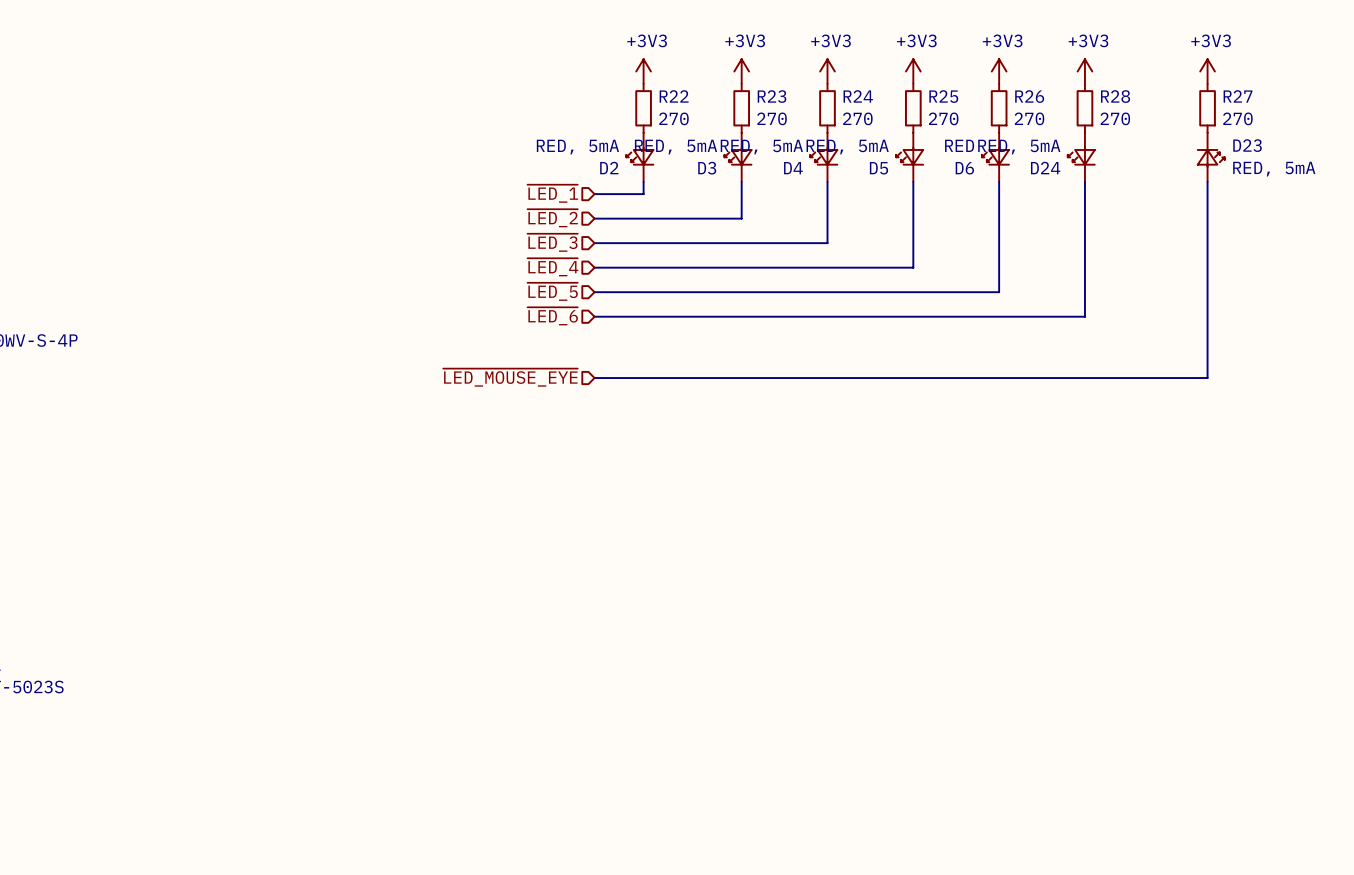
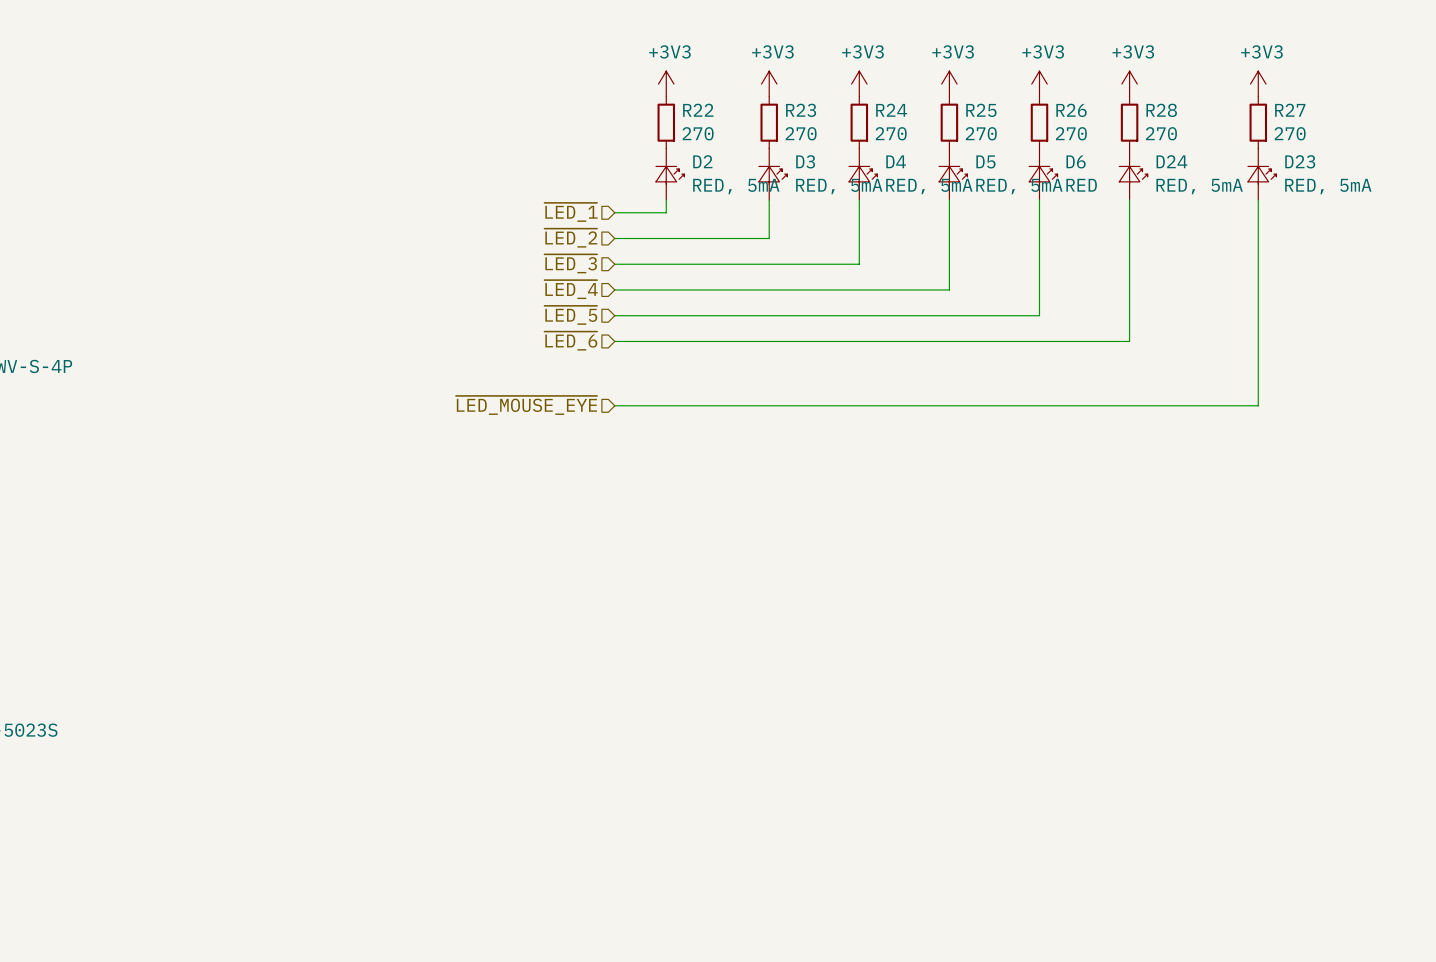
D2 rotation: 0° (639, 156) -> 180° (670, 175)
D3 rotation: 0° (738, 156) -> 180° (773, 175)
D4 rotation: 0° (823, 156) -> 180° (863, 175)
D5 rotation: 0° (909, 156) -> 180° (953, 175)
D6 rotation: 0° (995, 156) -> 180° (1043, 175)
D24 rotation: 0° (1081, 156) -> 180° (1133, 175)

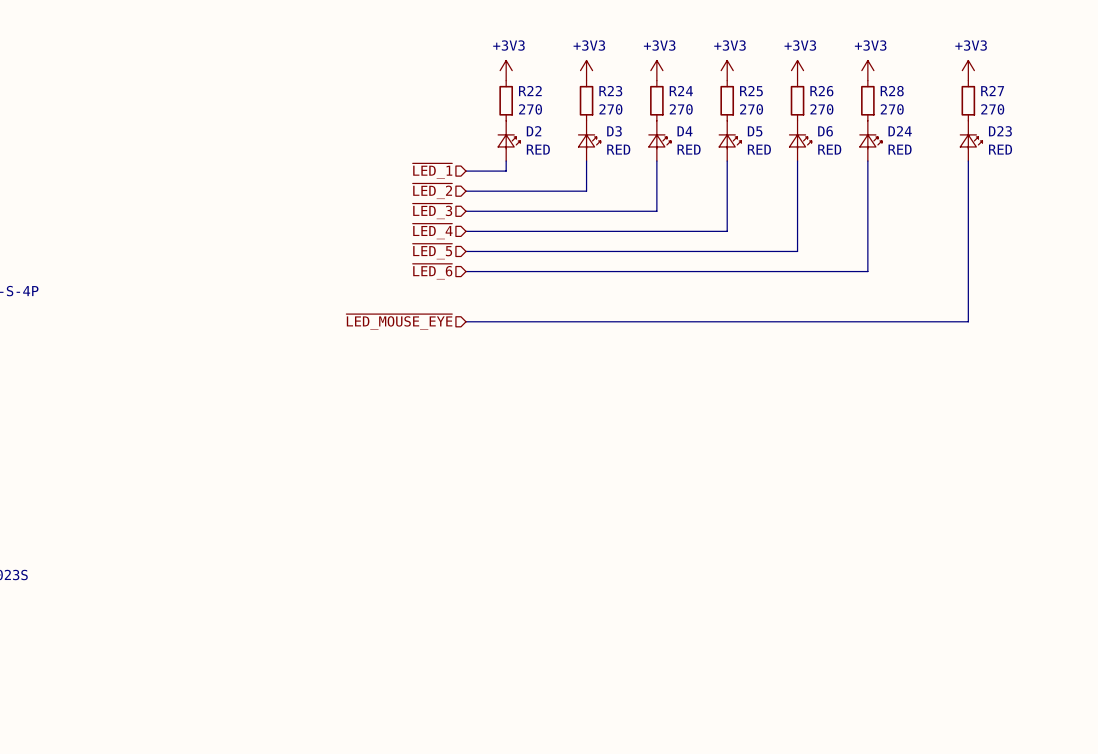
D2 value: RED, 5mA (736, 186) -> RED (538, 149)
D3 value: RED, 5mA (839, 186) -> RED (618, 149)
D4 value: RED, 5mA (929, 186) -> RED (689, 149)
D5 value: RED, 5mA (1019, 186) -> RED (759, 149)
D24 value: RED, 5mA (1199, 186) -> RED (900, 149)
D23 value: RED, 5mA (1328, 186) -> RED (1000, 149)

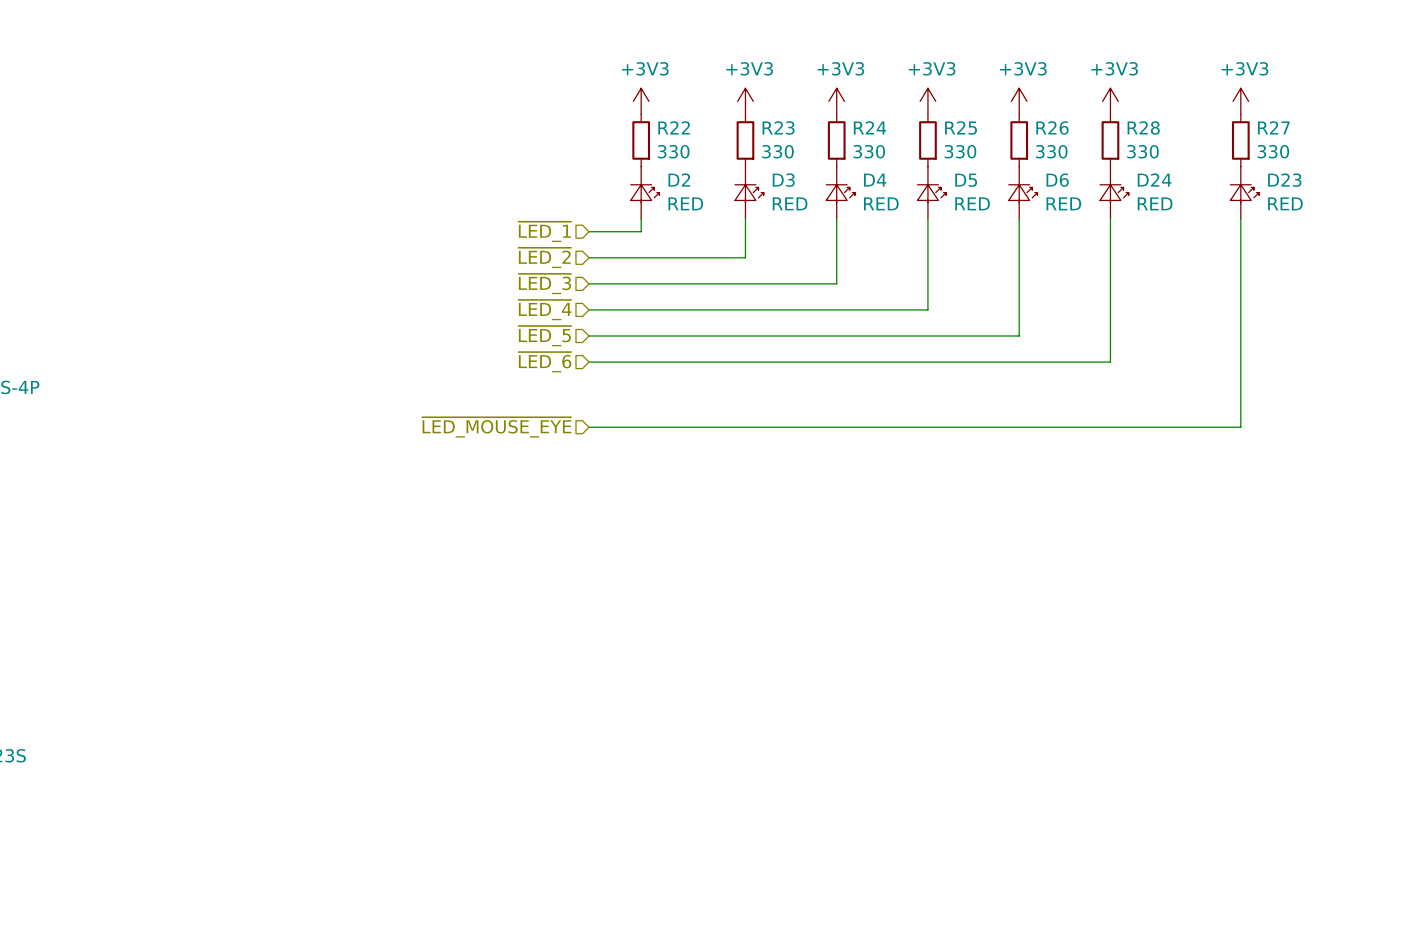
R22 value: 270 (530, 109) -> 330 (673, 151)
R23 value: 270 (610, 109) -> 330 (777, 151)
R24 value: 270 (681, 109) -> 330 (869, 151)
R25 value: 270 (751, 109) -> 330 (960, 151)
R26 value: 270 (821, 109) -> 330 (1051, 151)
R28 value: 270 (892, 109) -> 330 (1142, 151)
R27 value: 270 (992, 109) -> 330 (1273, 151)

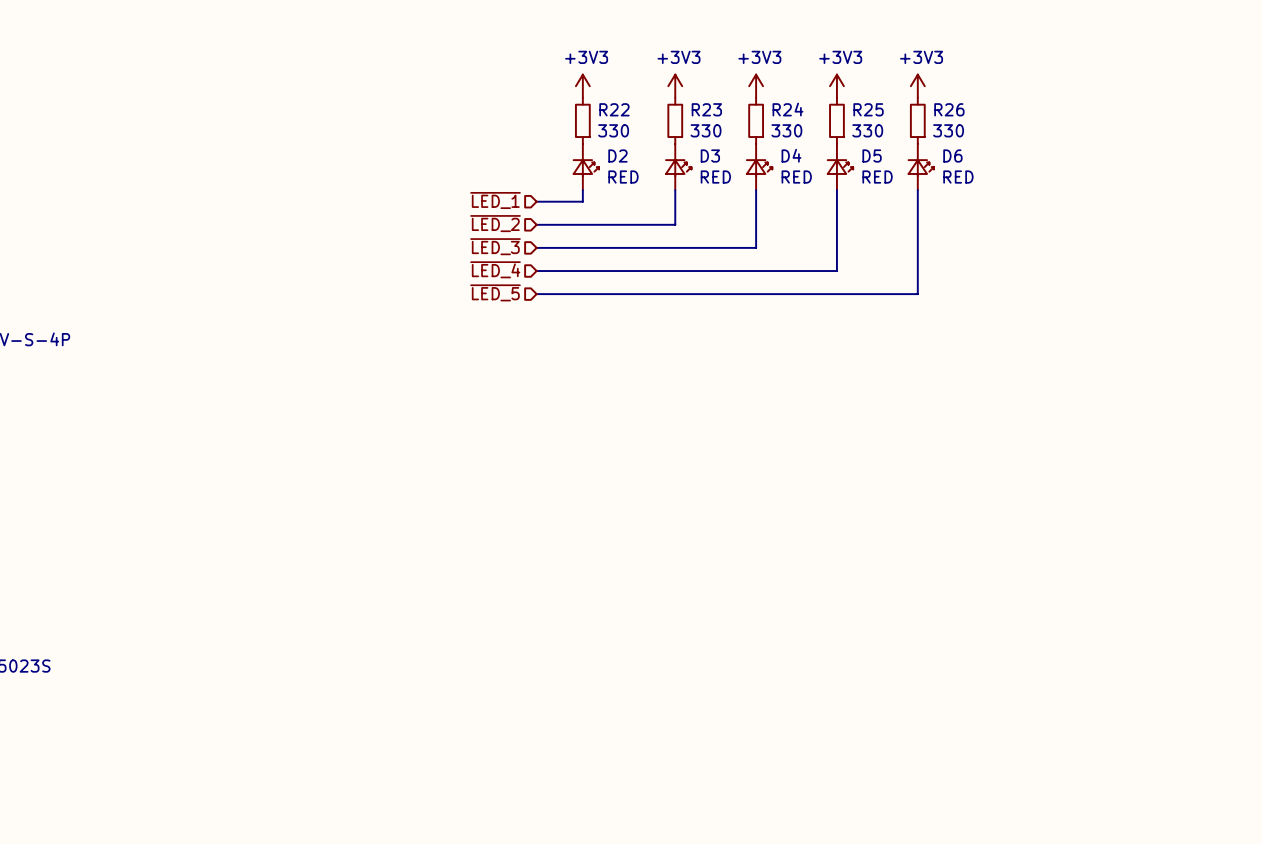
power symbol: +3V3 (1110, 101) -> none
power symbol: +3V3 (1240, 101) -> none
R28: 330 (1110, 140) -> none
R27: 330 (1240, 140) -> none
D24: RED (1114, 192) -> none
D23: RED (1244, 192) -> none
wire: (1110, 218) (1110, 362) (589, 362) -> none
wire: (1240, 218) (1240, 427) (589, 427) -> none
hierarchical label: ~{LED_6} (544, 362) -> none
hierarchical label: ~{LED_MOUSE_EYE} (496, 427) -> none

